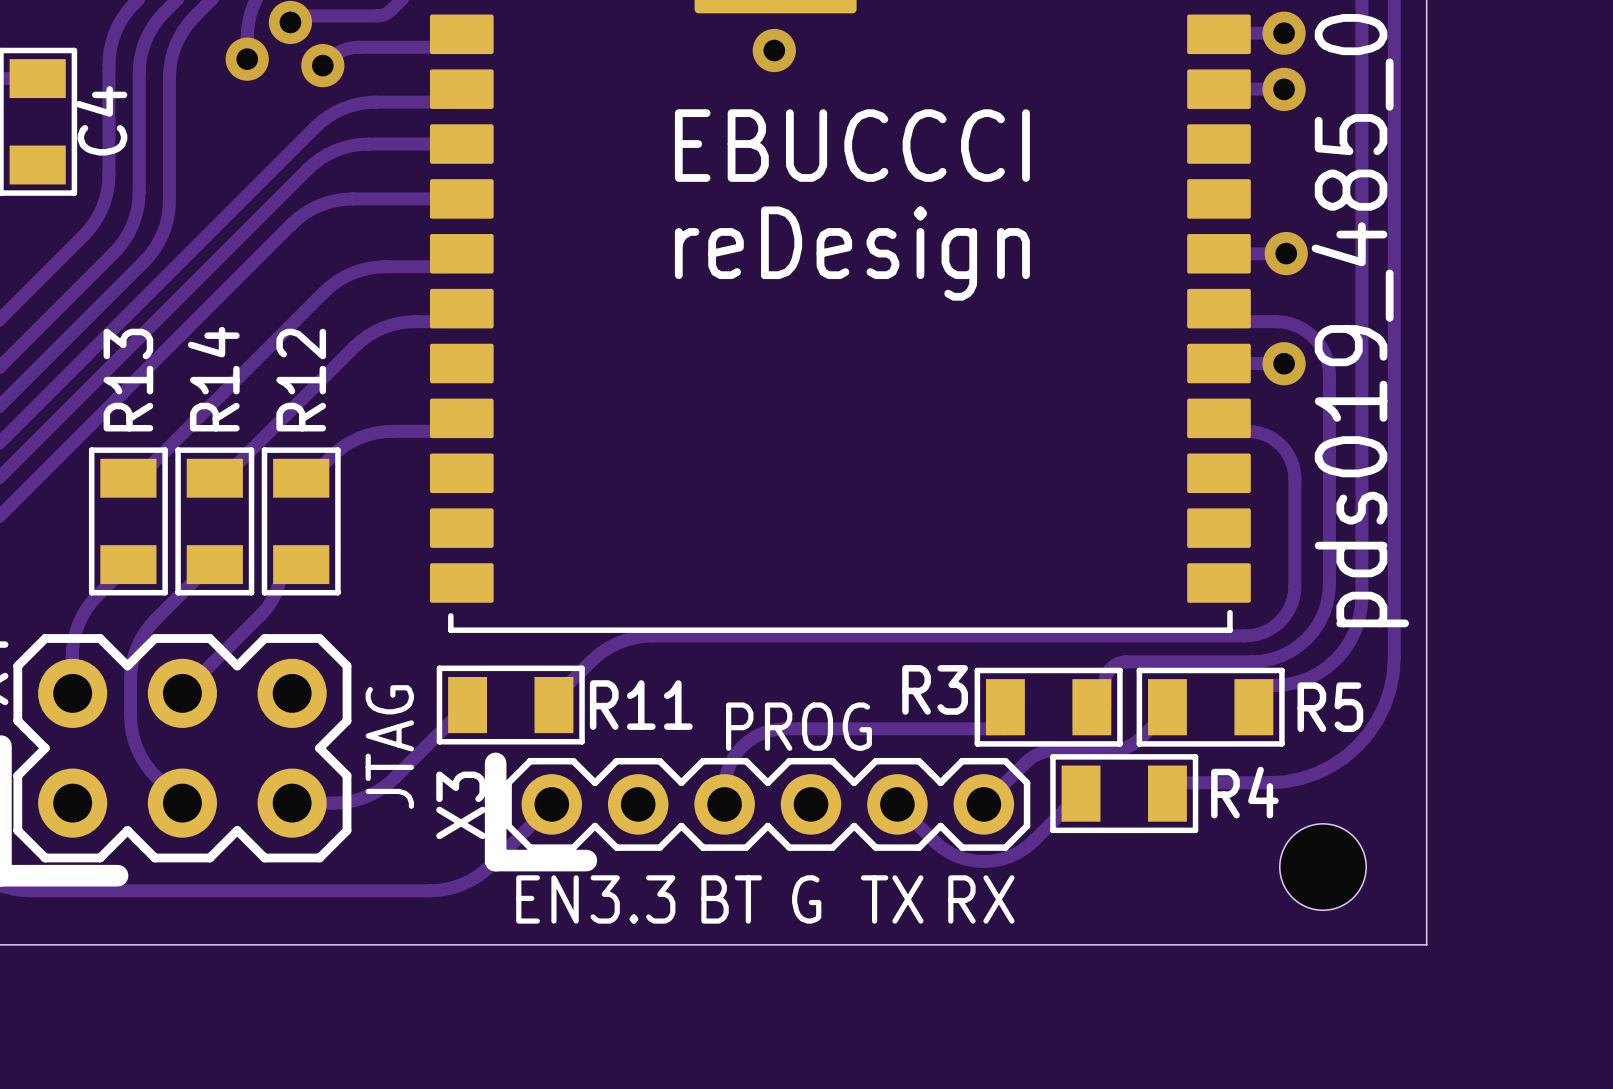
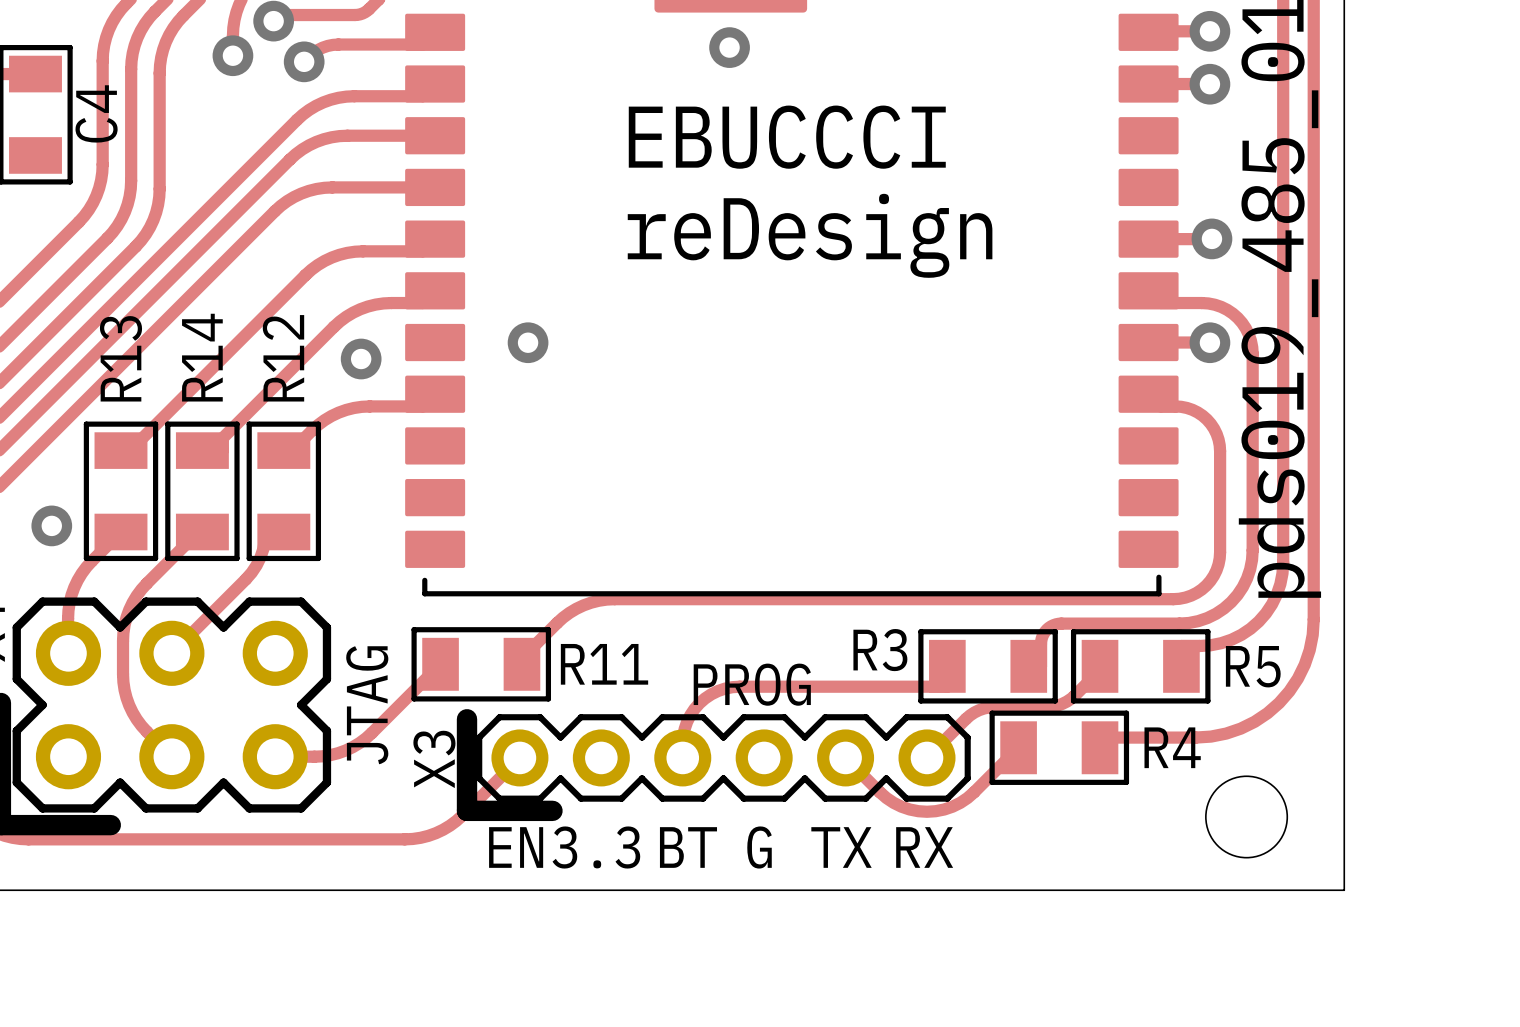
via: none -> (528, 342)
via: none -> (361, 359)
via: none -> (51, 525)

